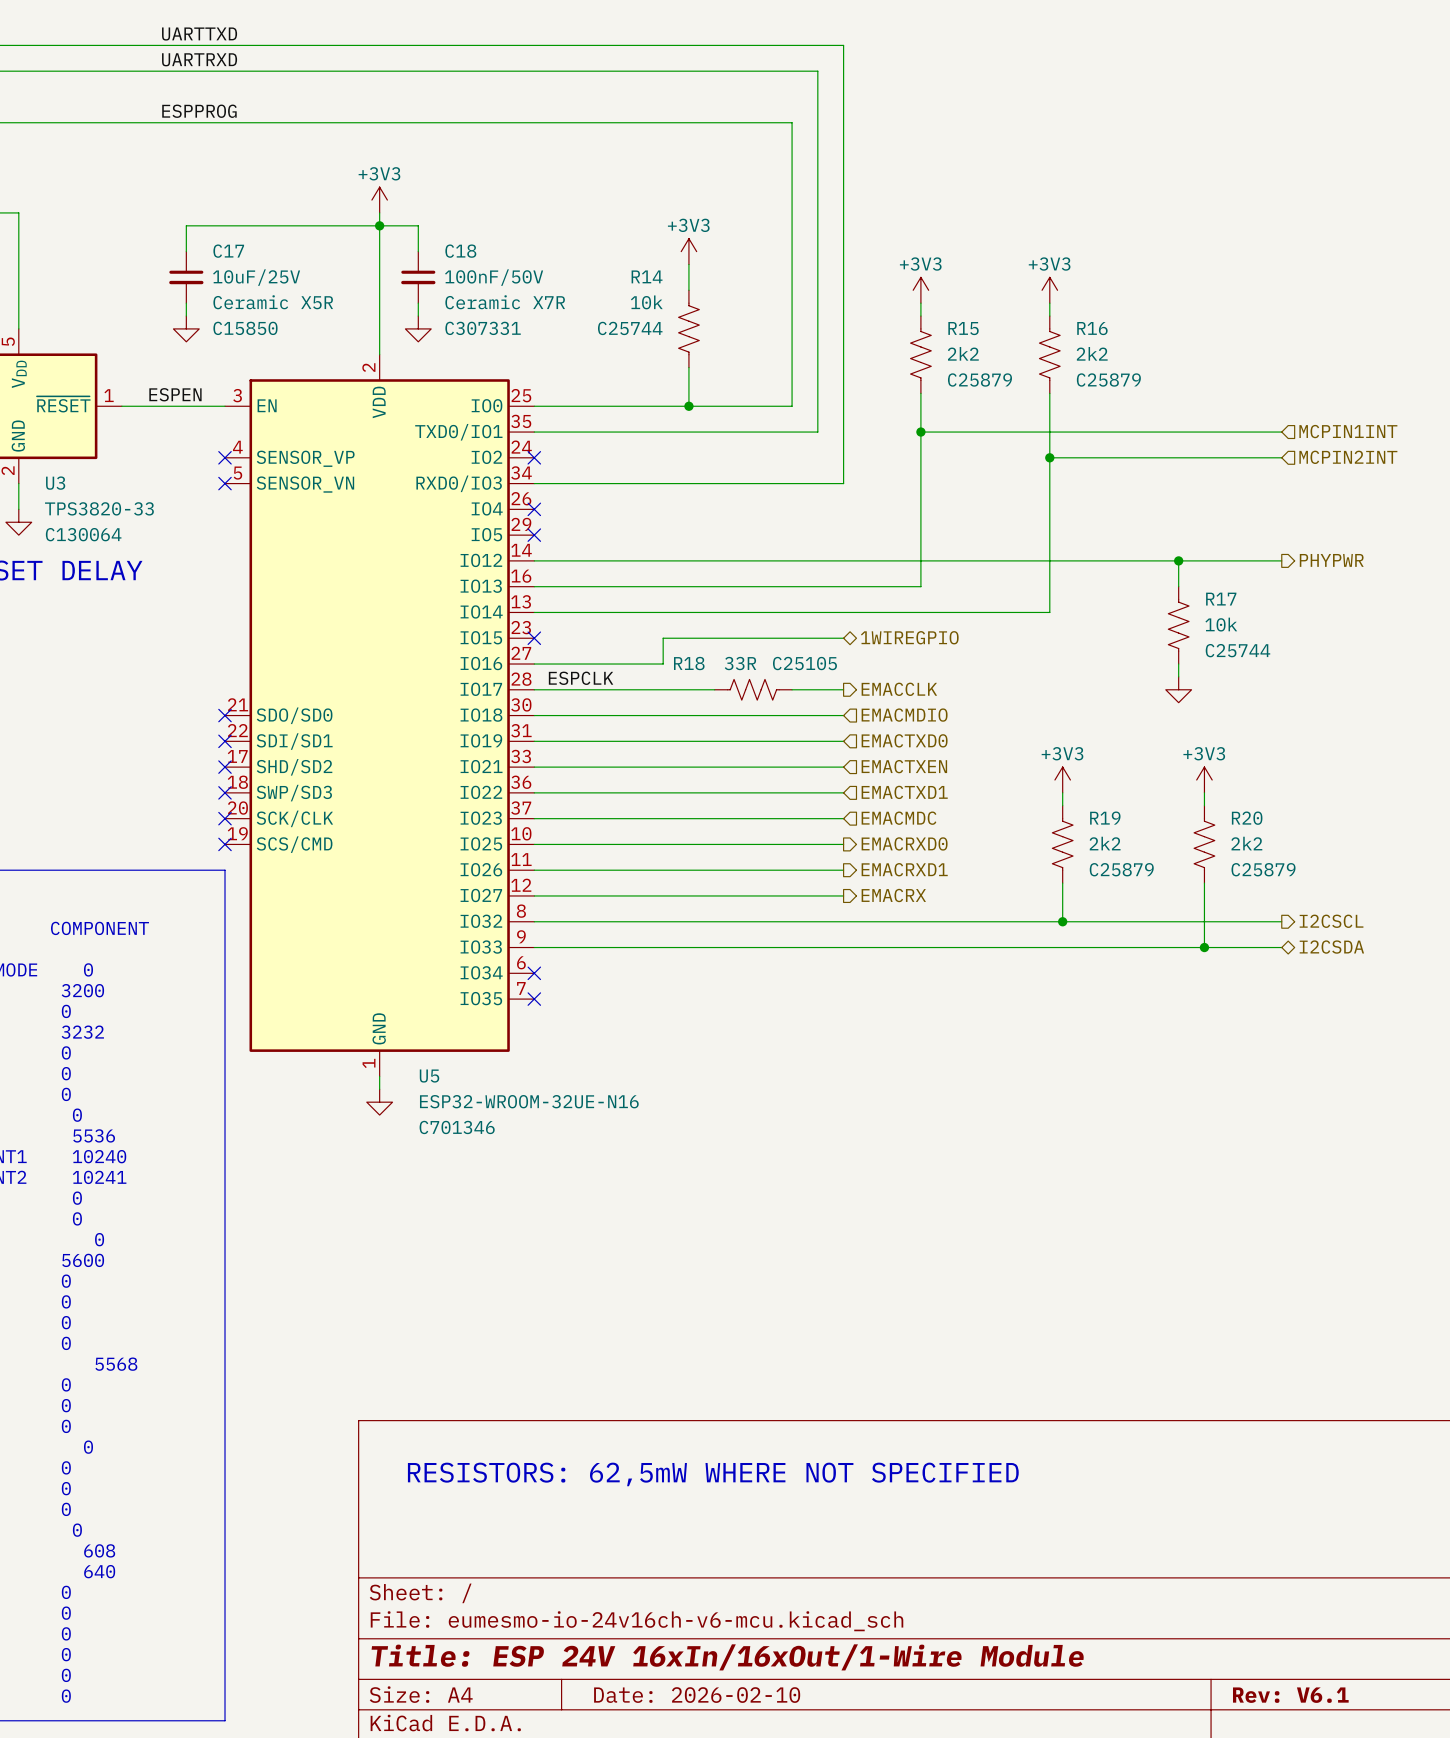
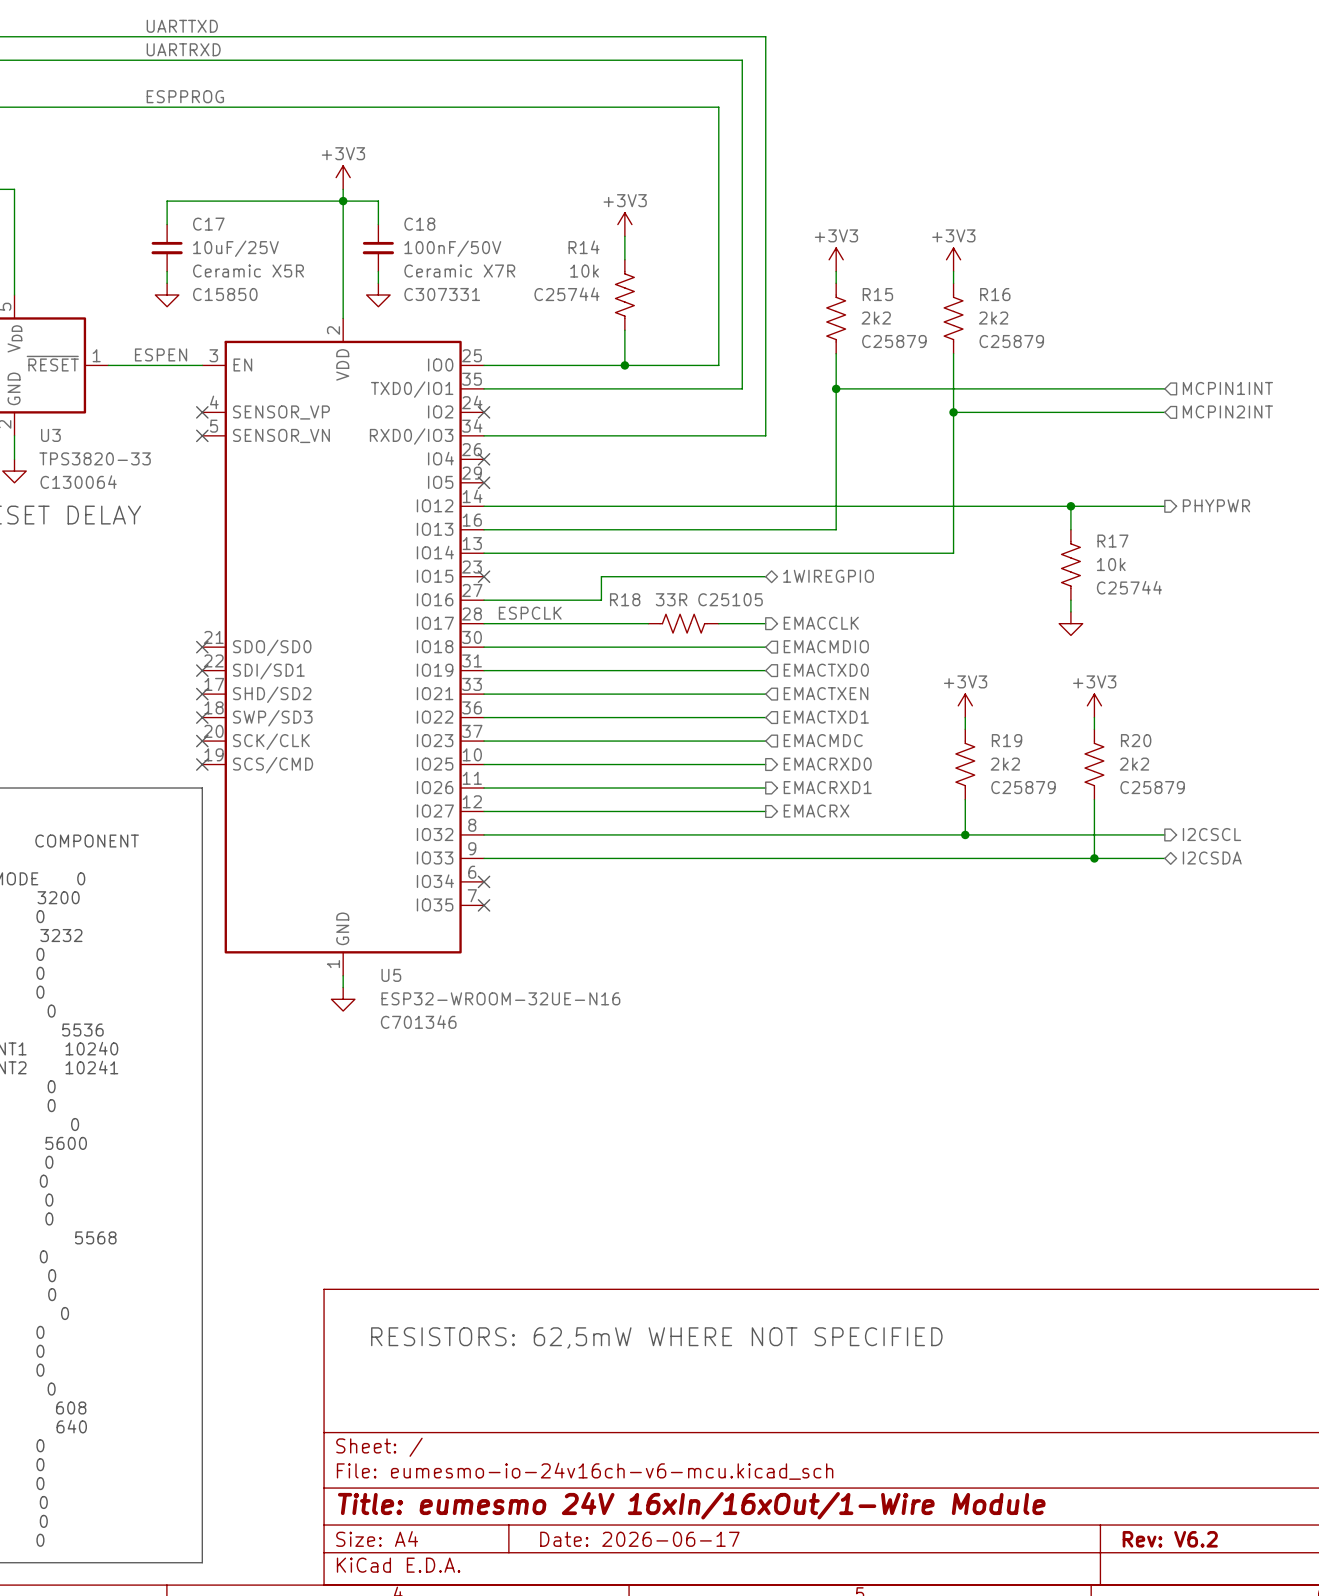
title block: Title: ESP 24V 16xIn/16xOut/1-Wire Module (727, 1657) -> Title: eumesmo 24V 16xIn/16xOut/1-Wire Module (691, 1505)
title block: Date: 2026-02-10 (697, 1695) -> Date: 2026-06-17 (639, 1539)
title block: Rev: V6.1 (1290, 1695) -> Rev: V6.2 (1170, 1539)

